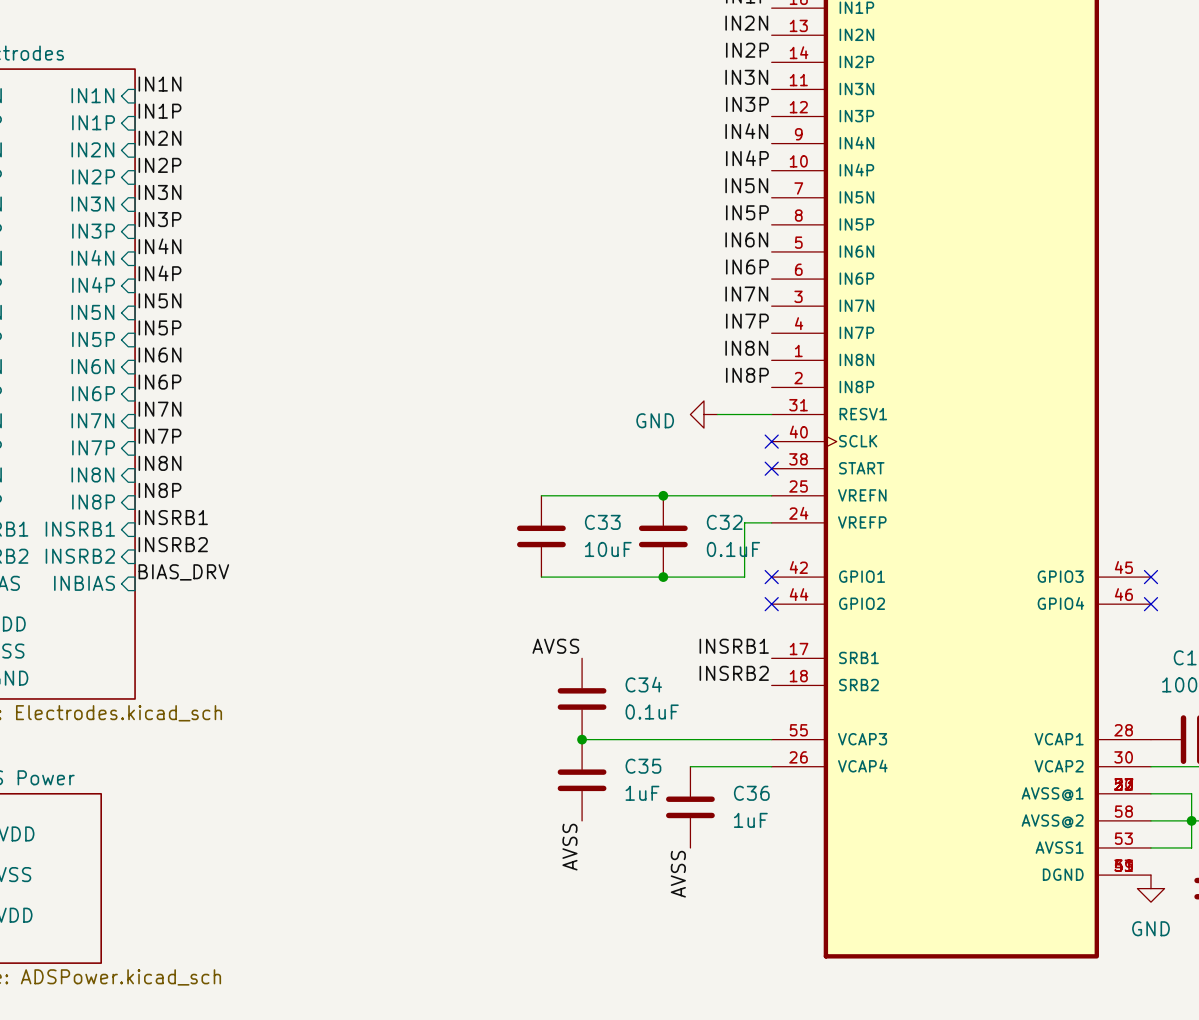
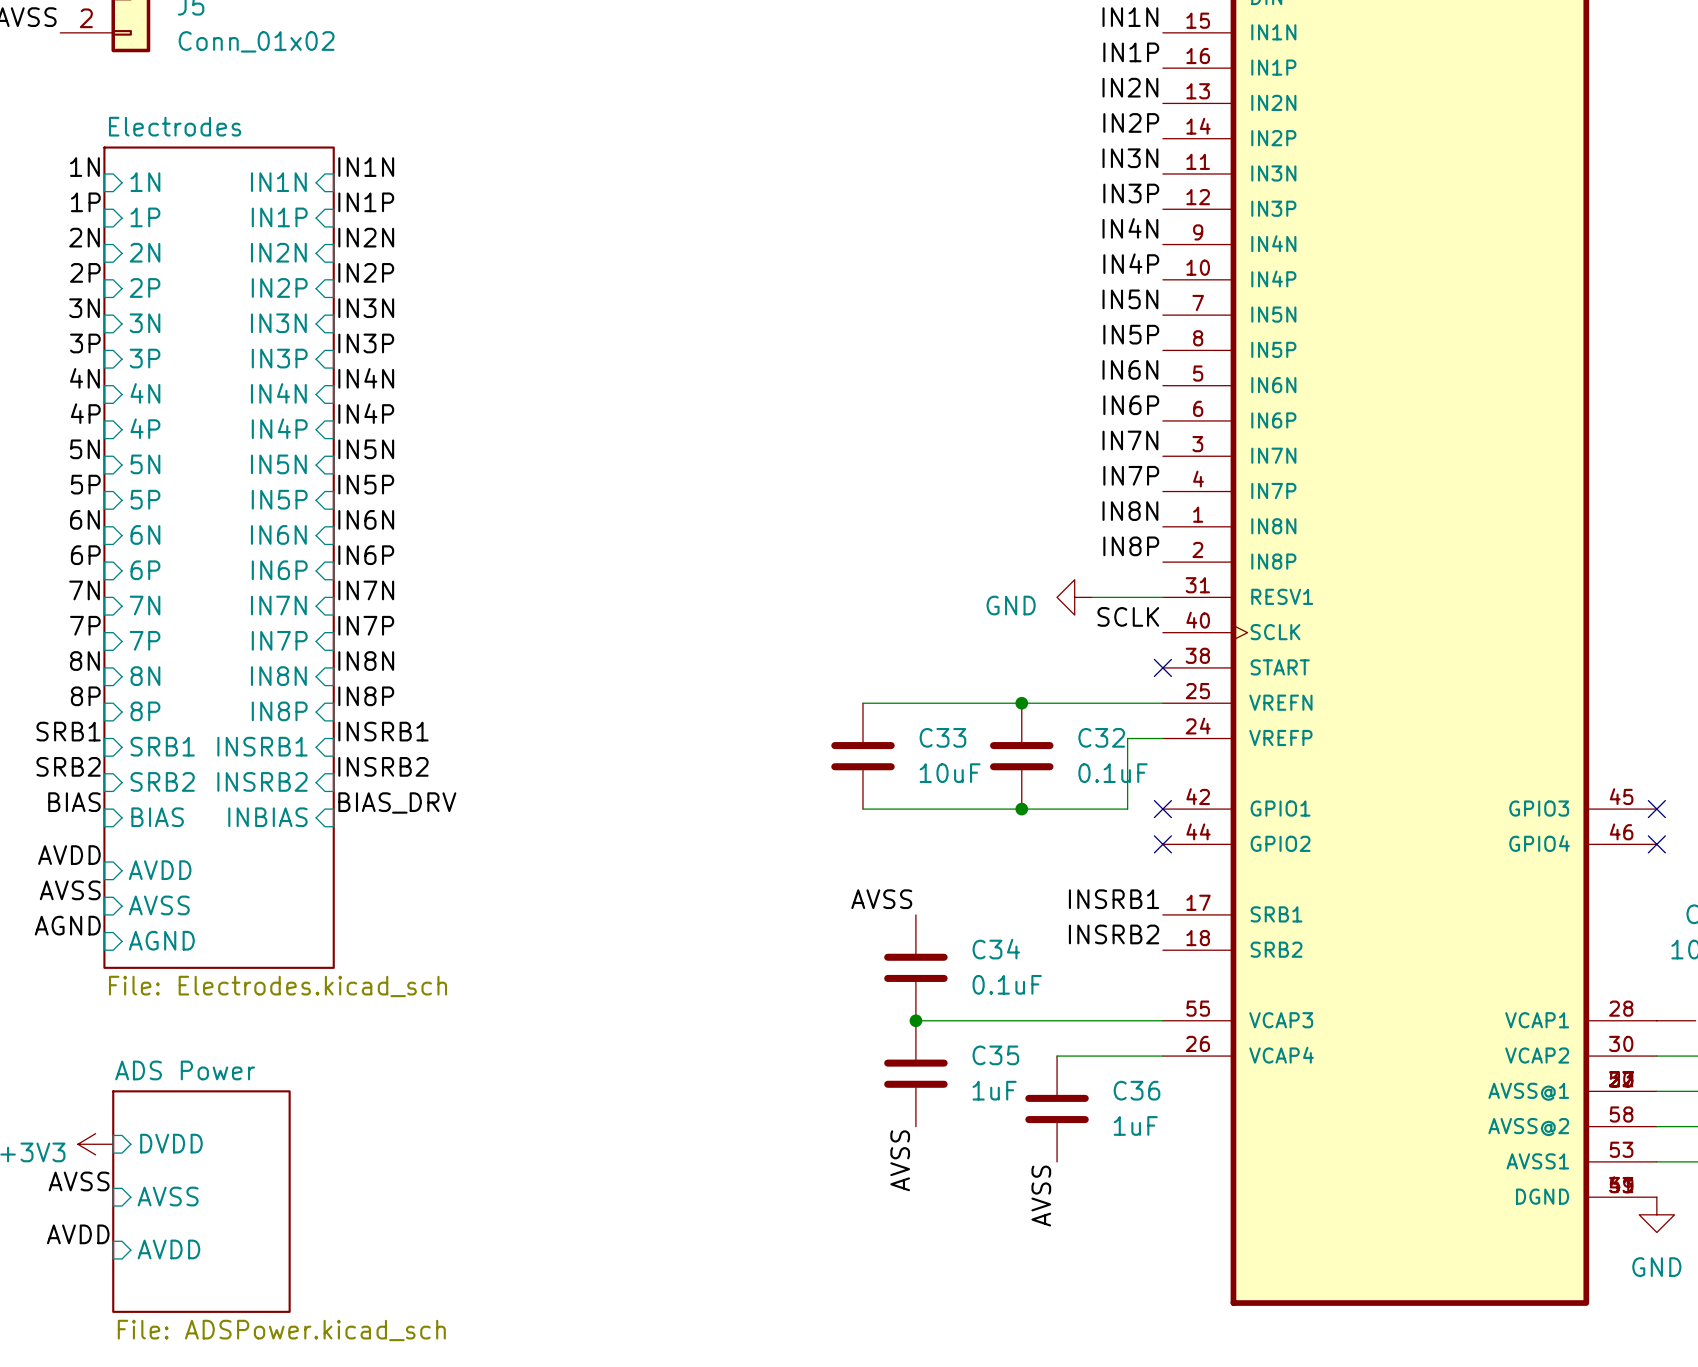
label: none -> SCLK (1128, 616)
no-connect mark: (771, 441) -> none

